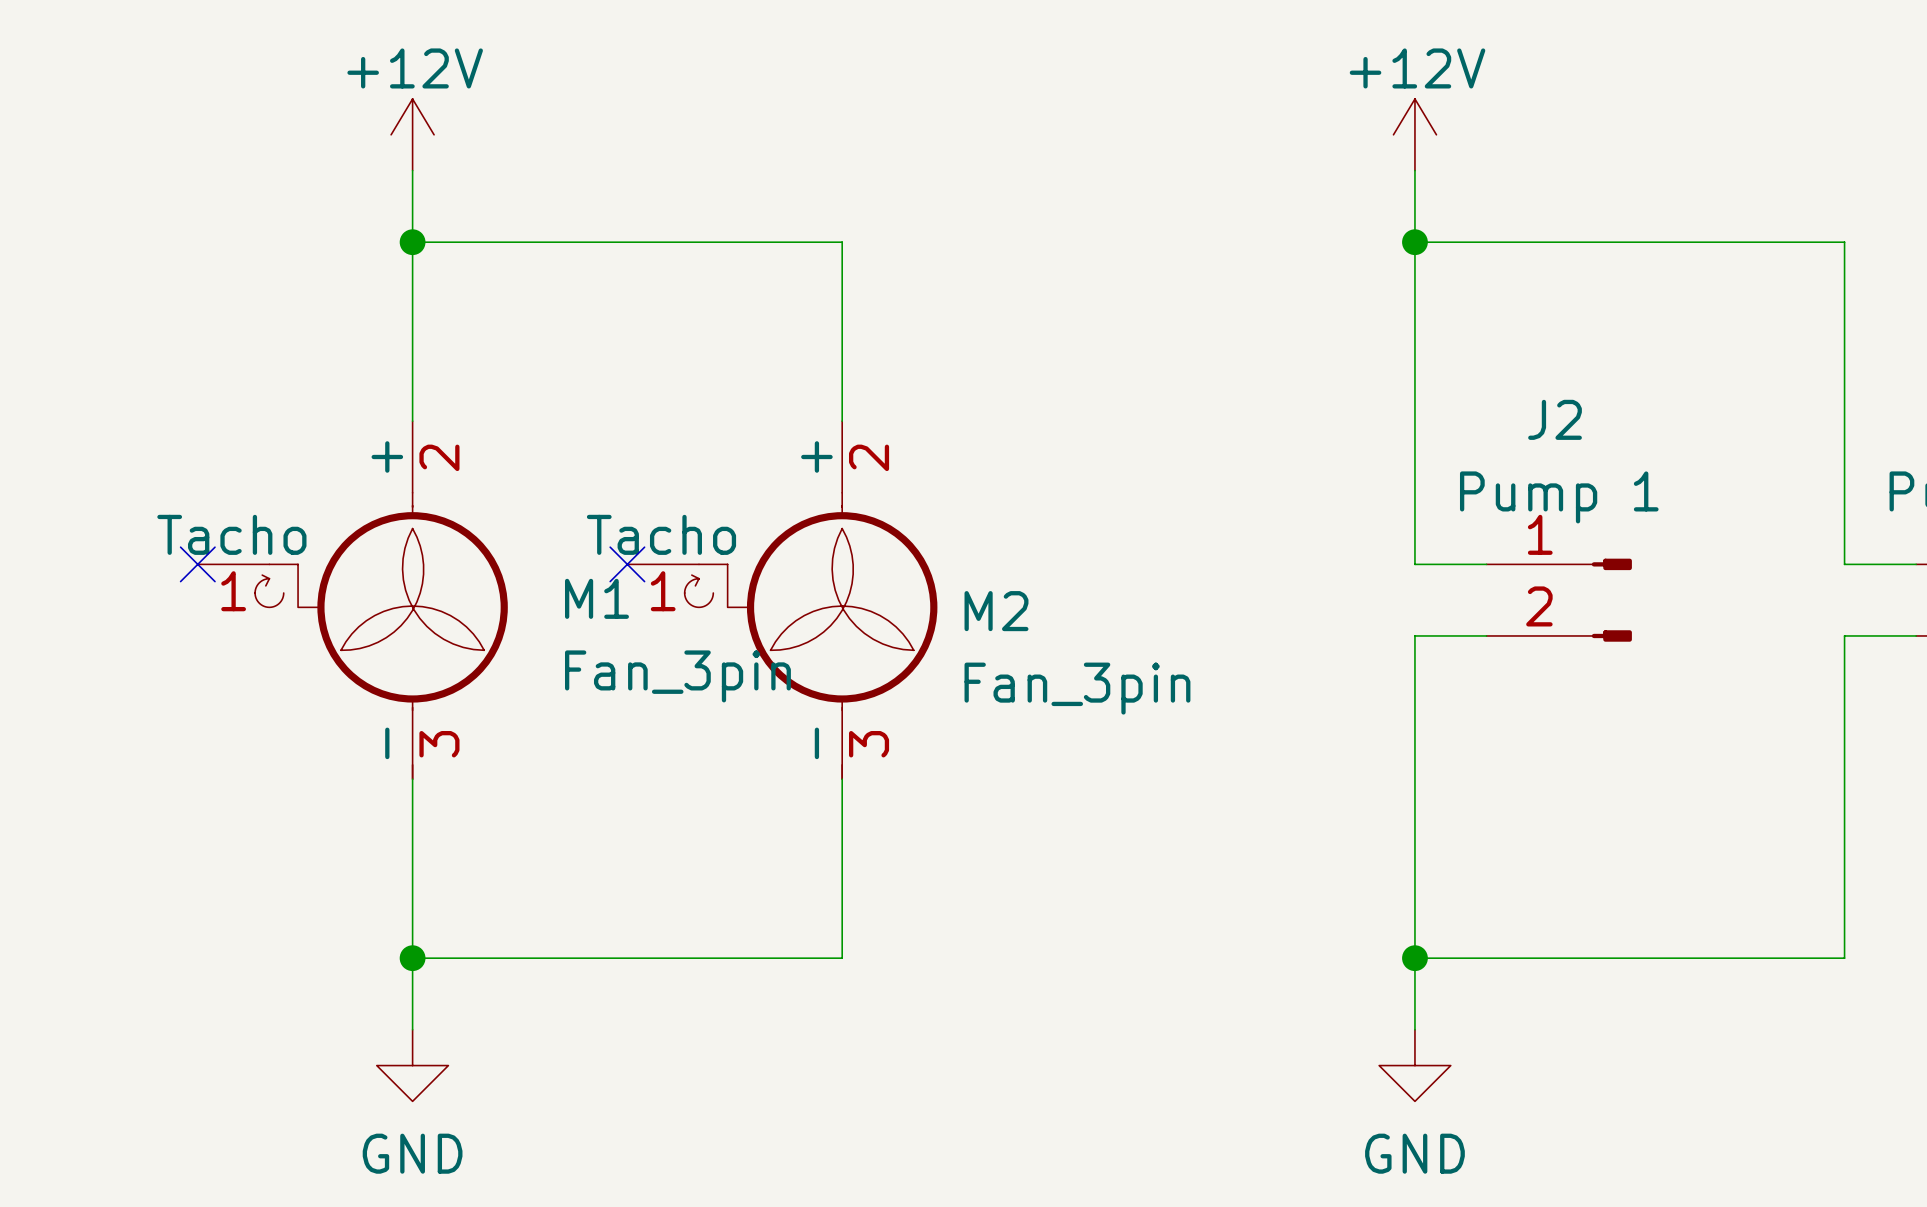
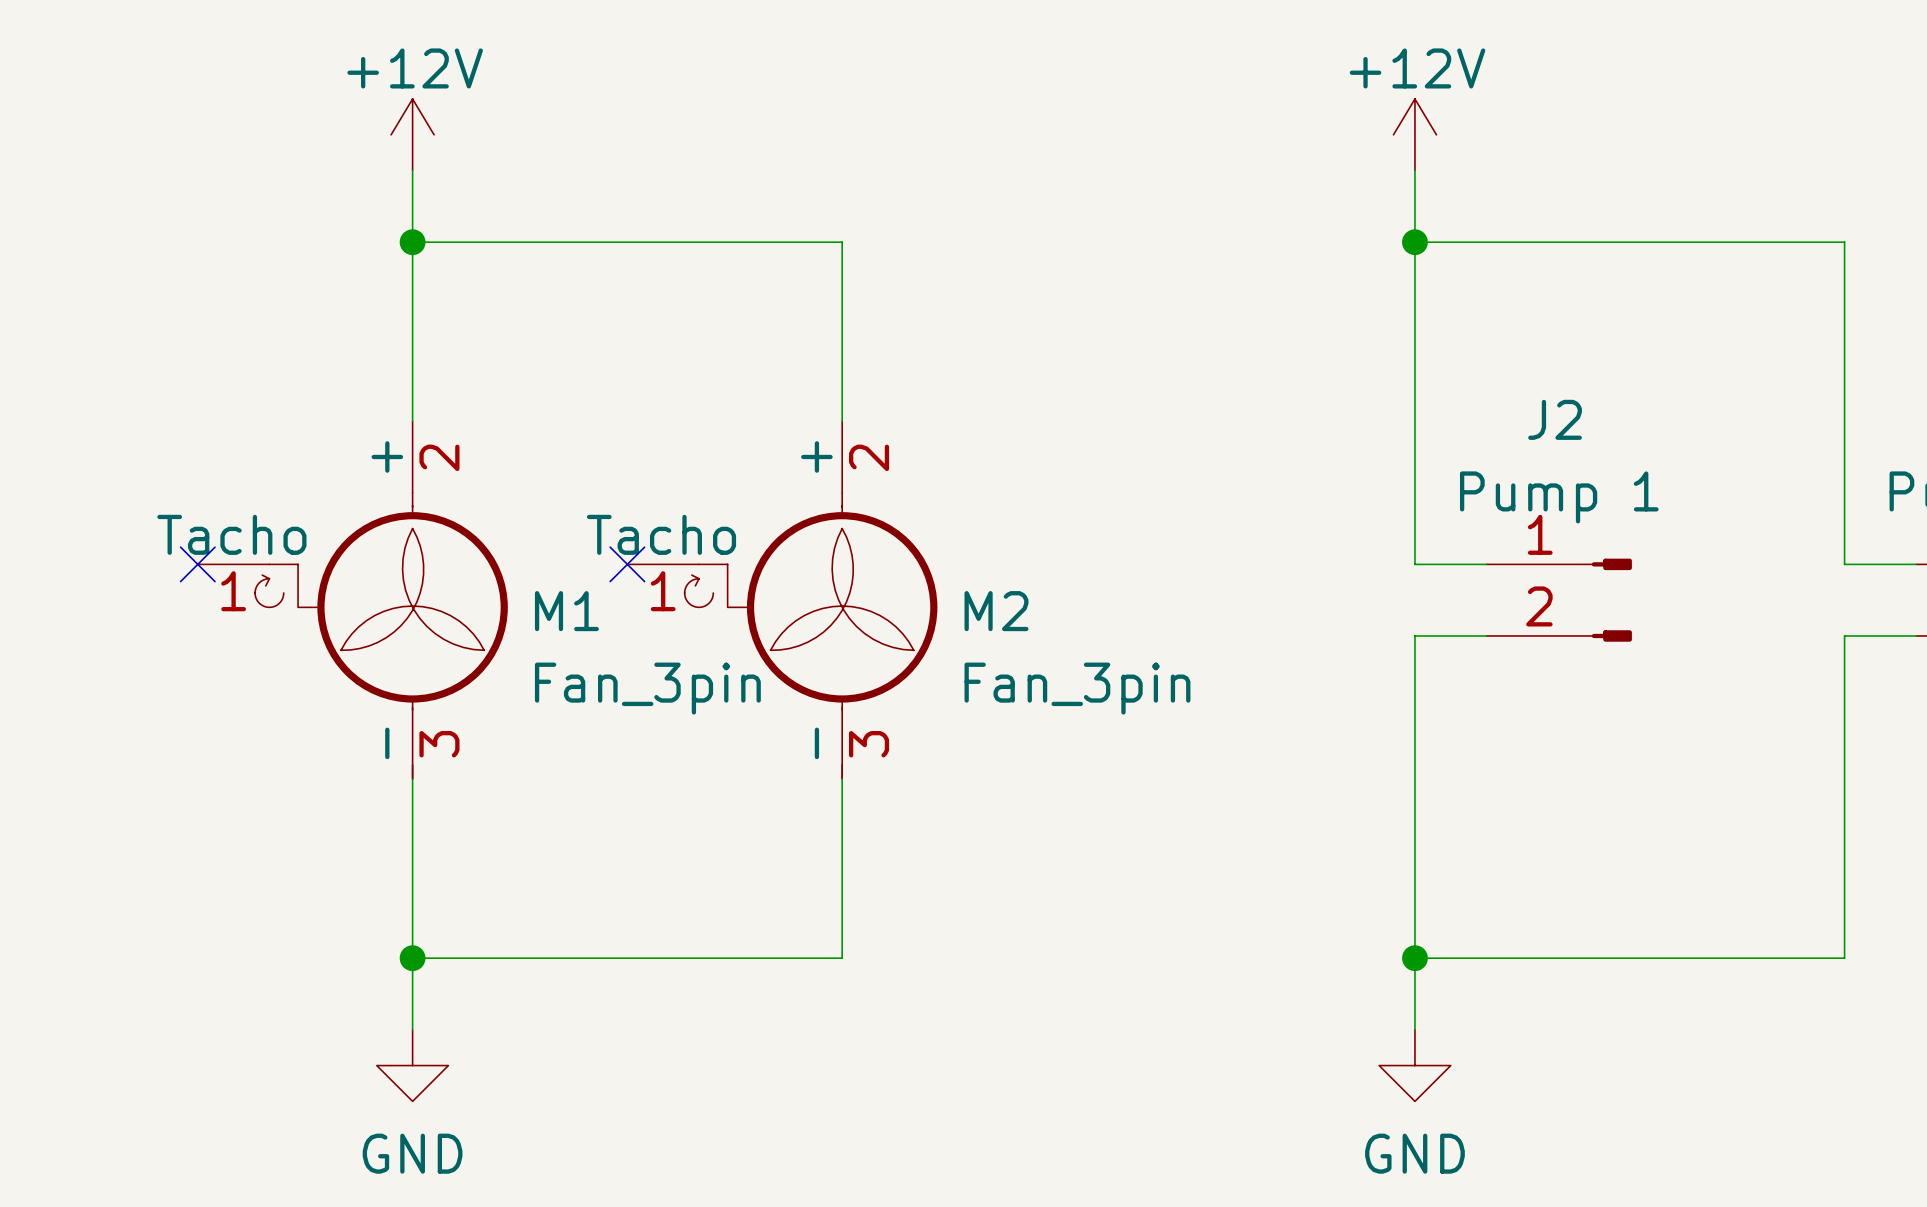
M1 name position: M1 (596, 598) -> M1 (566, 611)
M1 value position: Fan_3pin (677, 676) -> Fan_3pin (647, 688)

